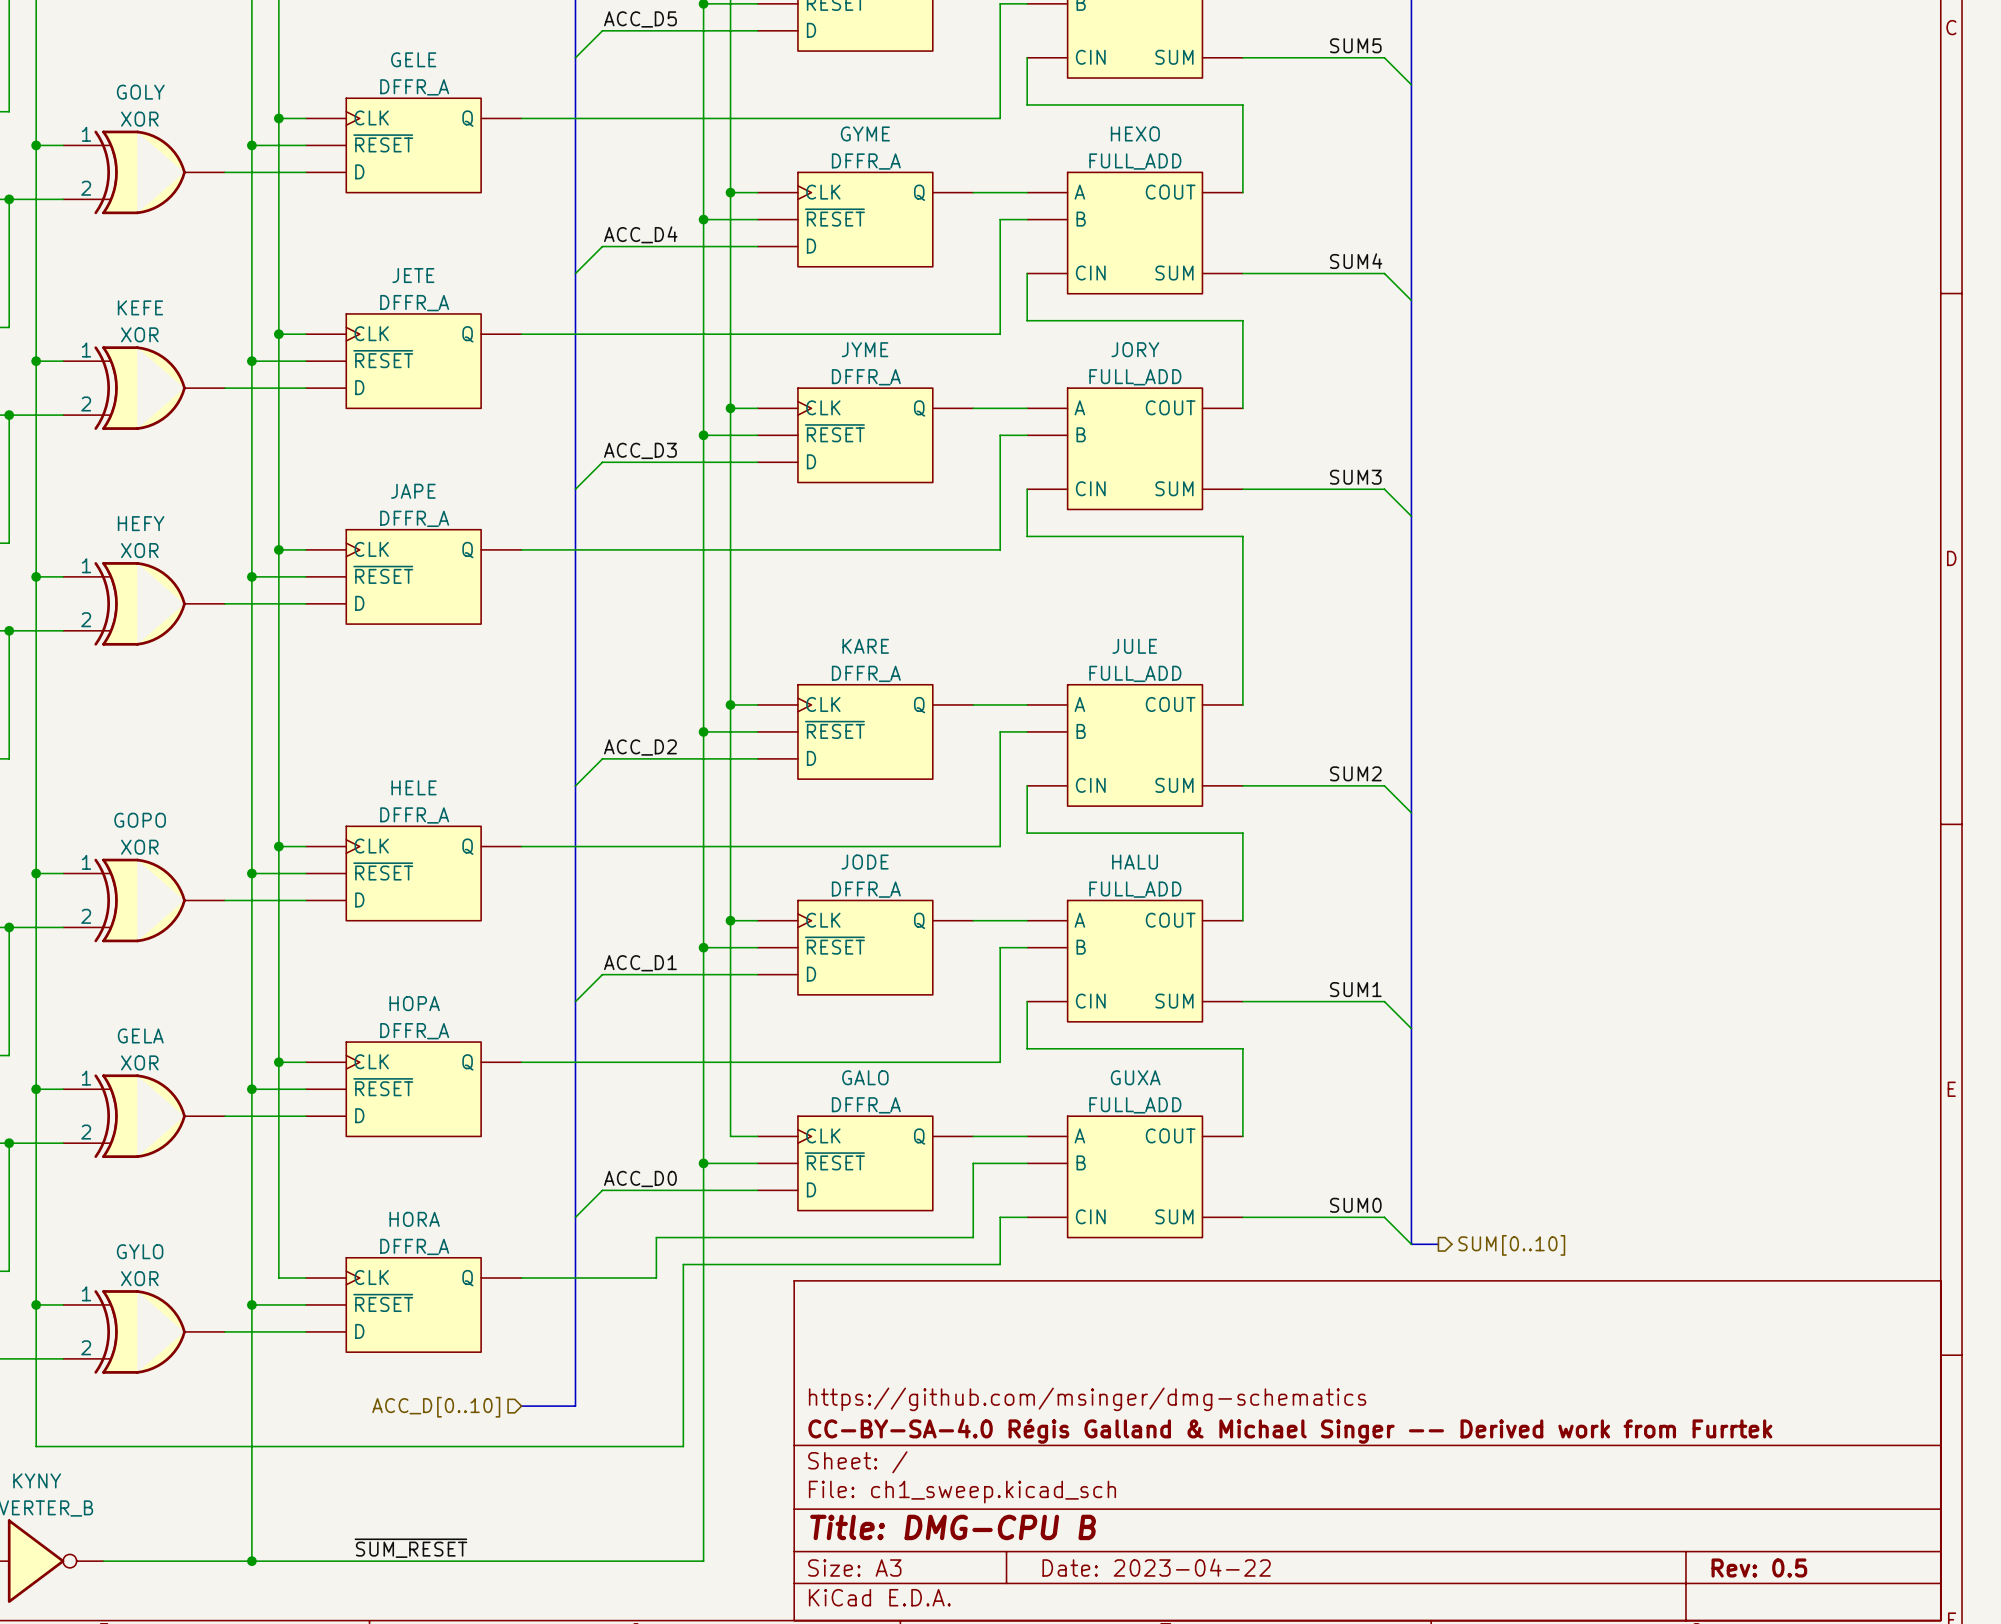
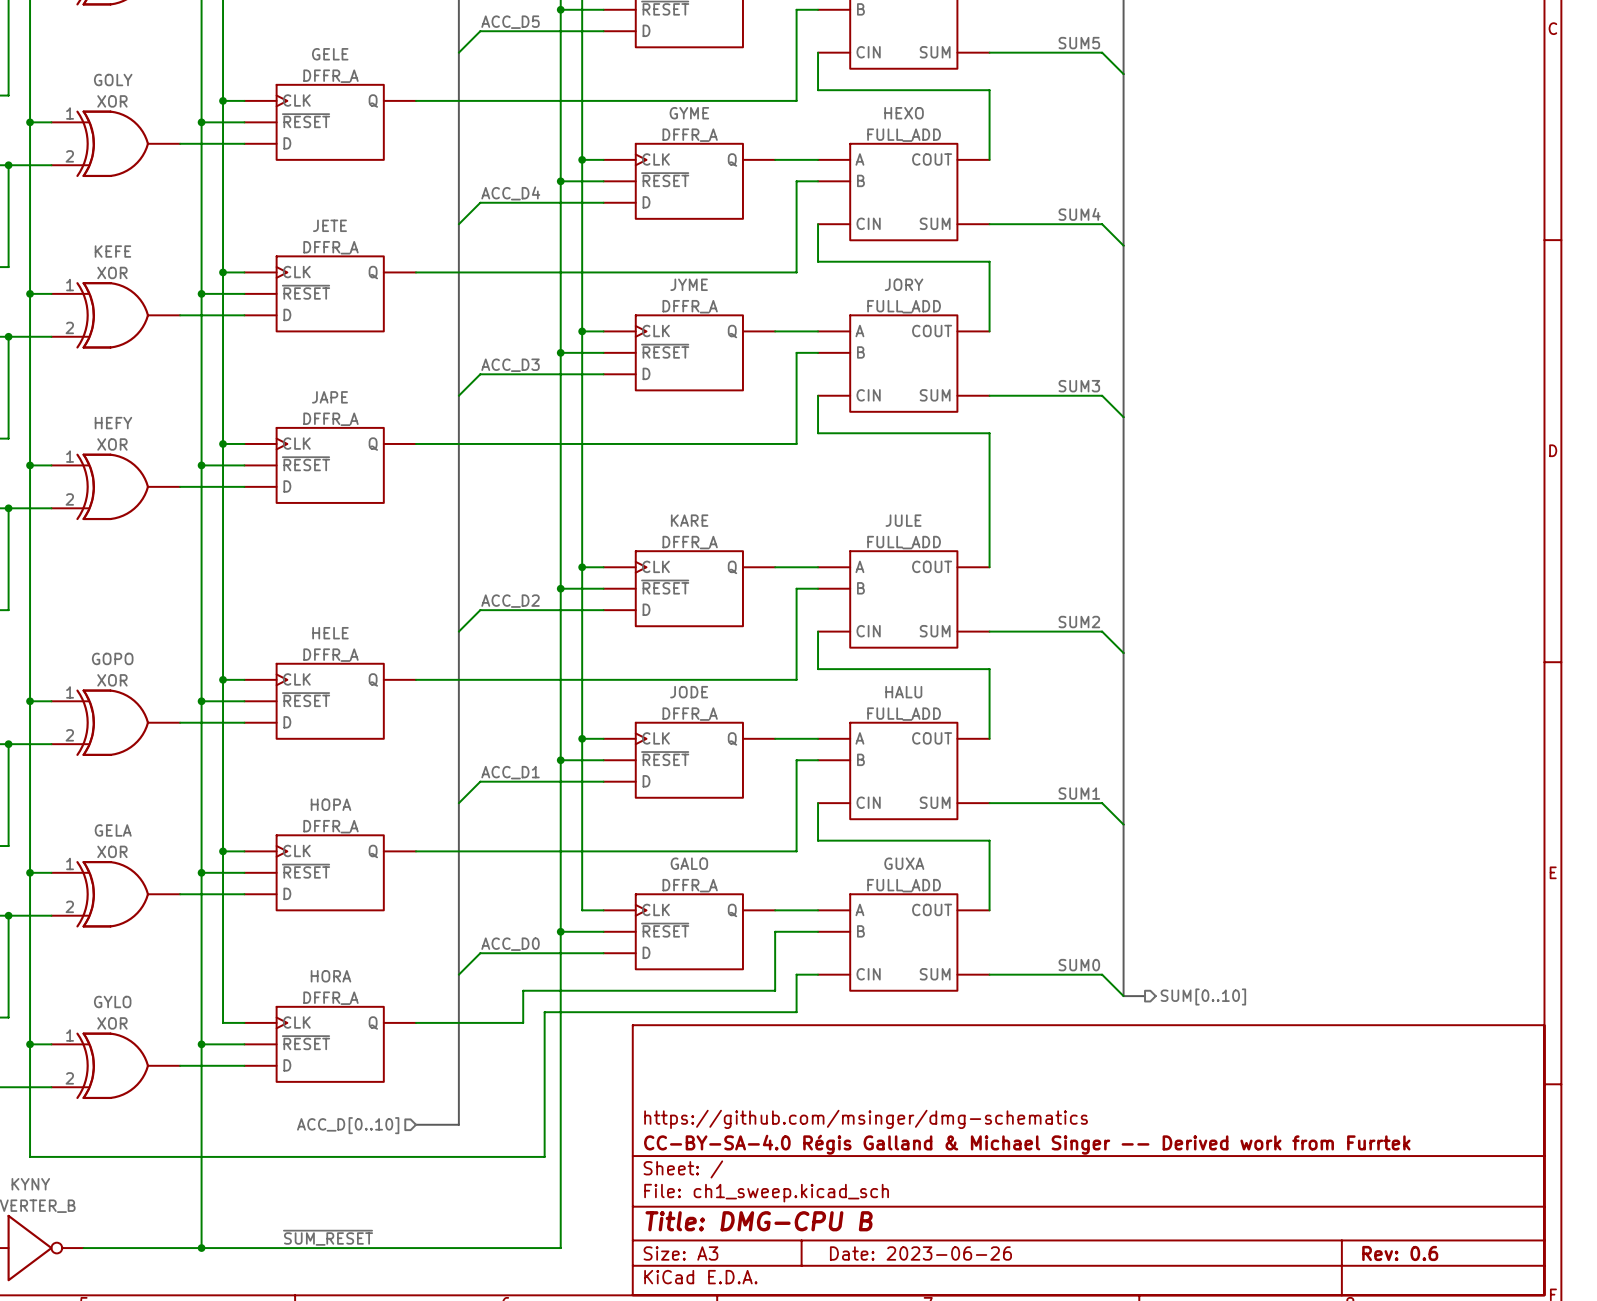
title block: Date: 2023-04-22 (1156, 1567) -> Date: 2023-06-26 (920, 1253)
title block: Rev: 0.5 (1759, 1567) -> Rev: 0.6 (1400, 1253)

